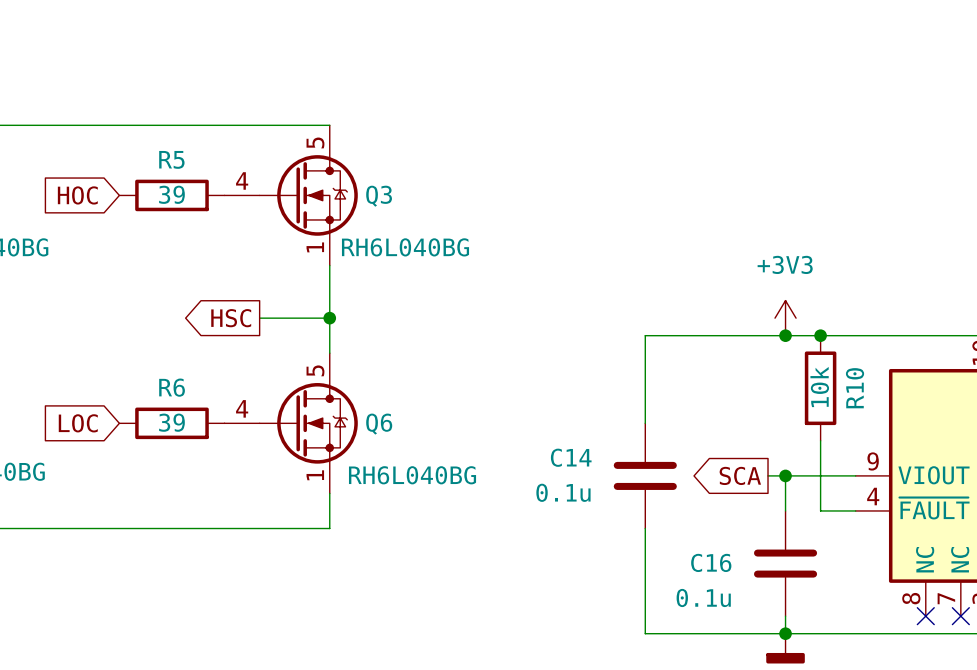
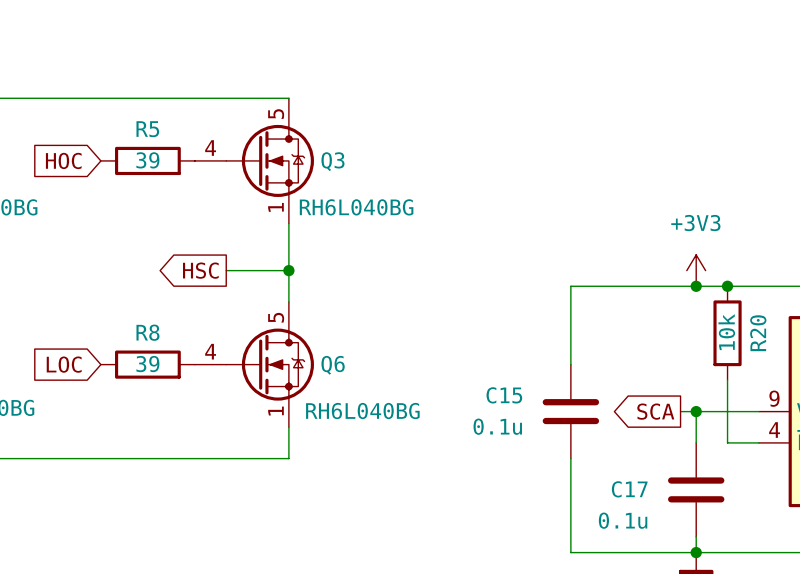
R6 name: R6 (172, 387) -> R8 (147, 332)
R10 name: R10 (855, 388) -> R20 (758, 333)
C14 name: C14 (571, 457) -> C15 (504, 395)
C16 name: C16 (711, 562) -> C17 (629, 489)

